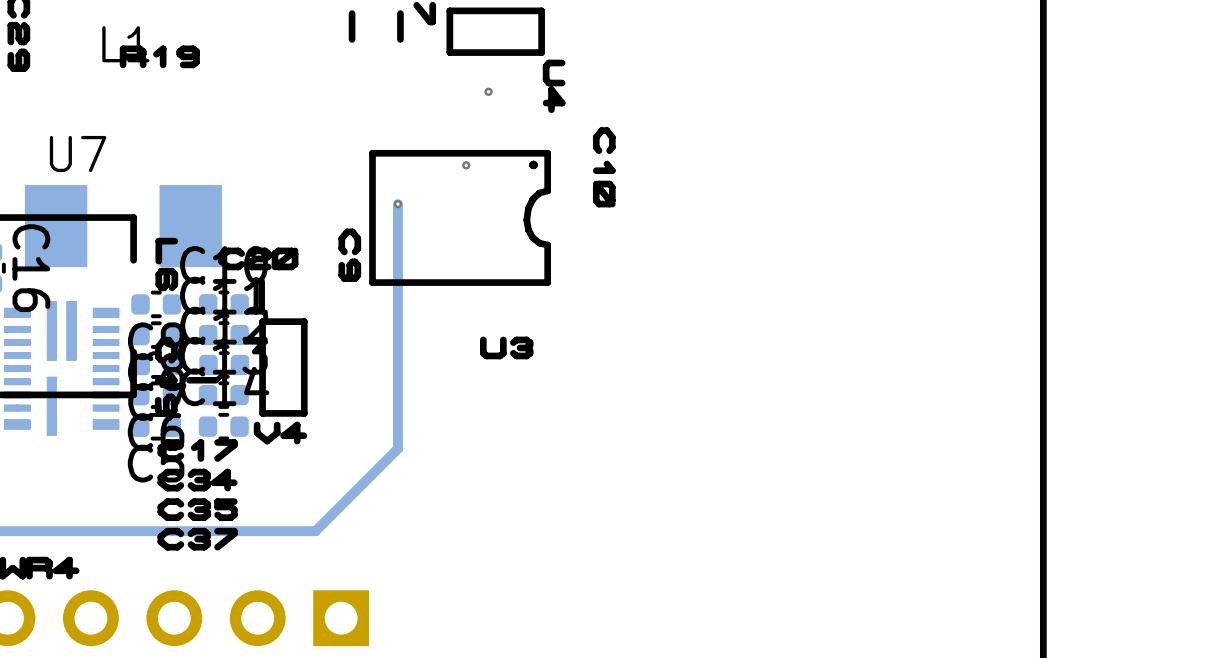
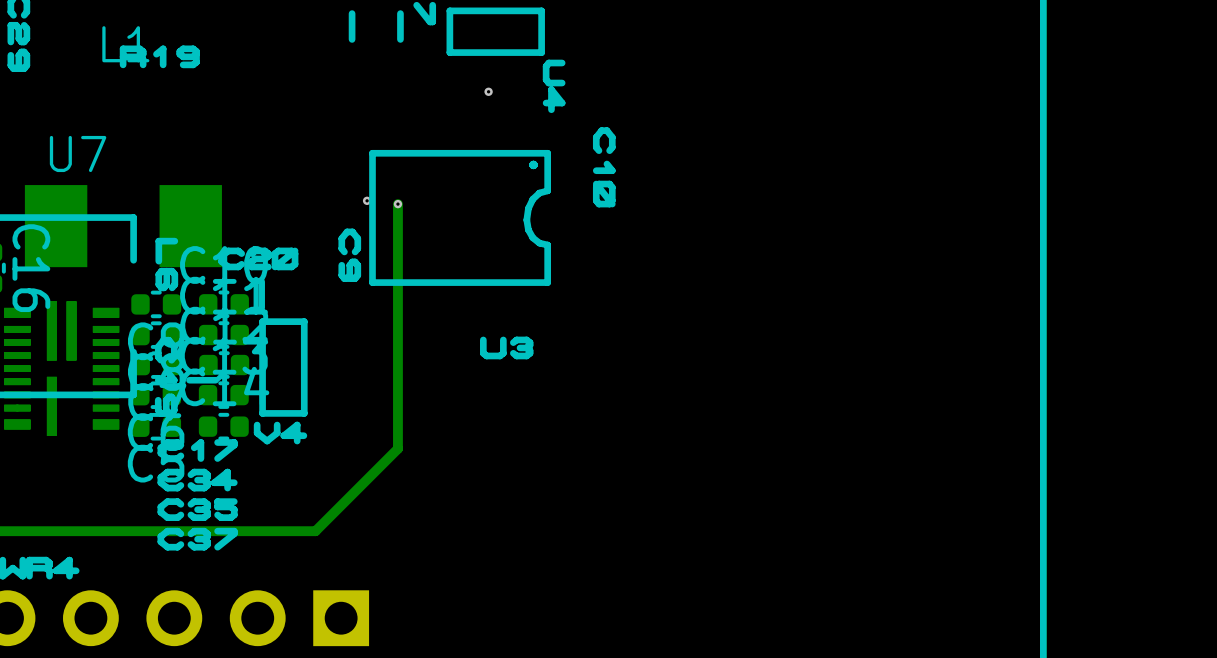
via position: (466, 165) -> (367, 200)

